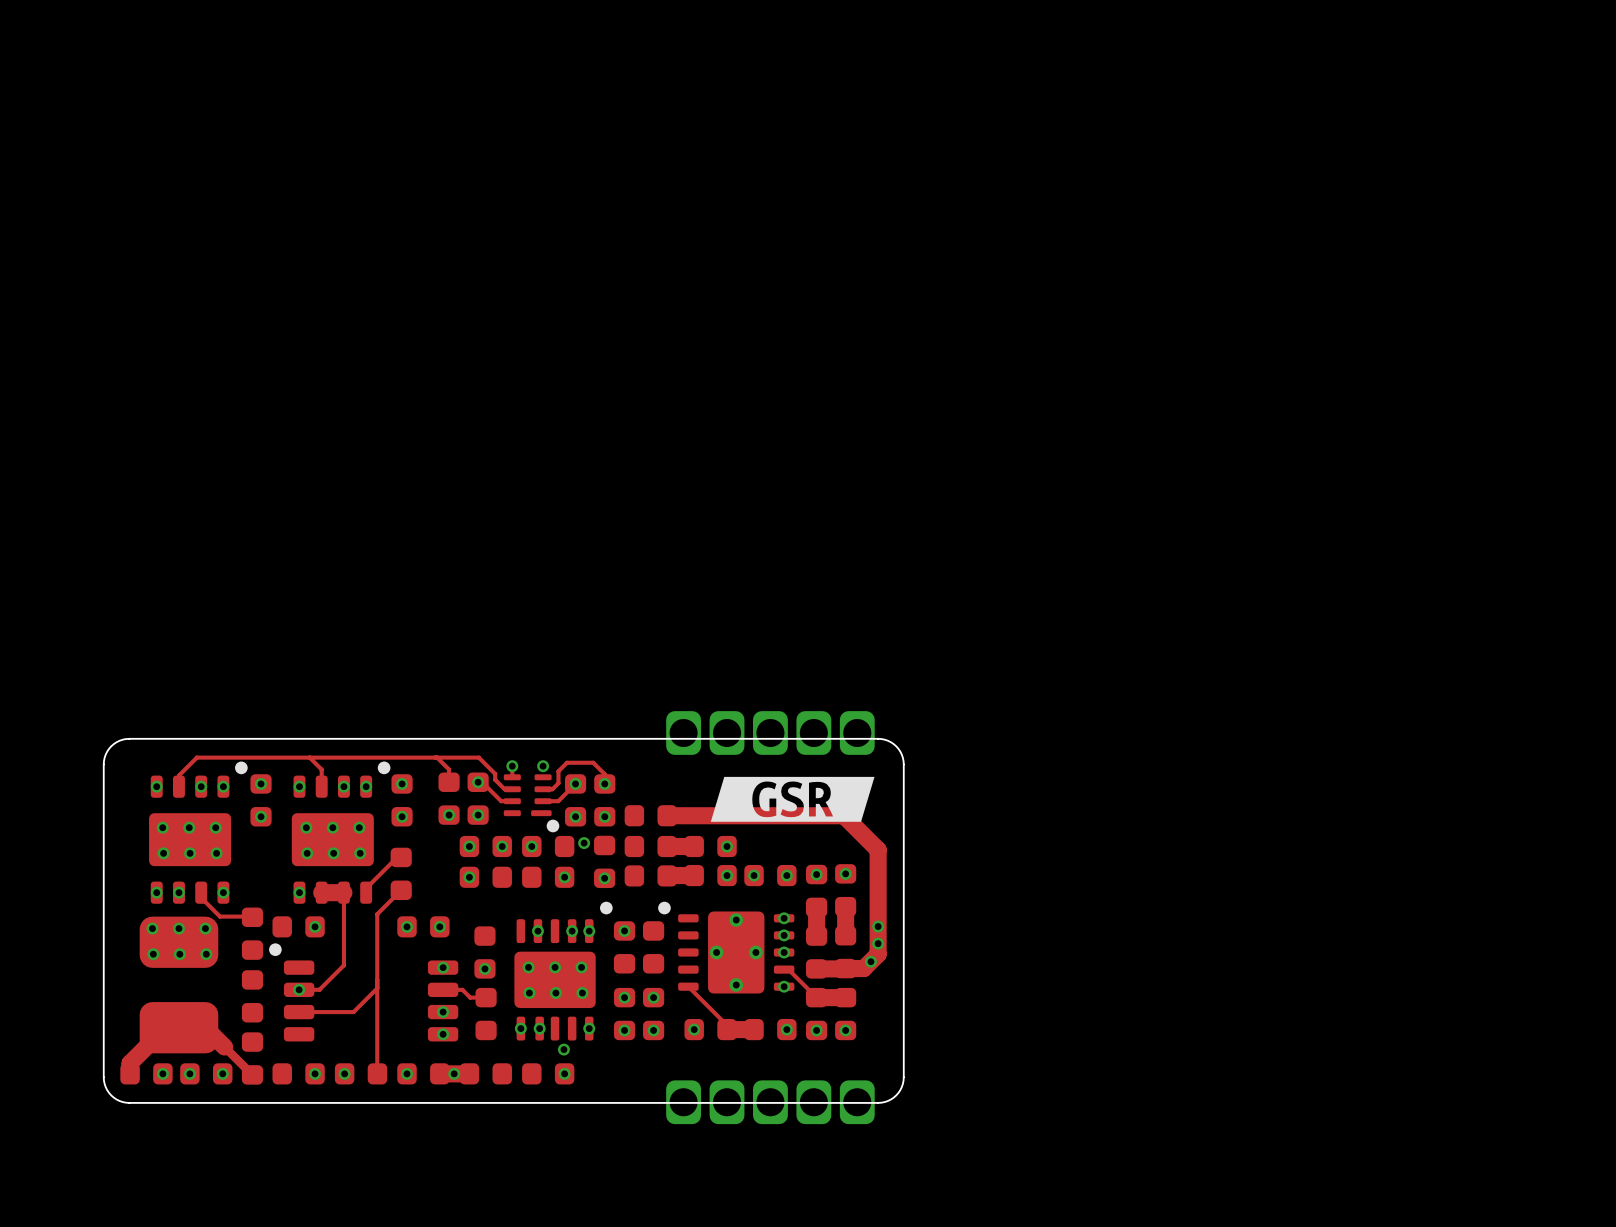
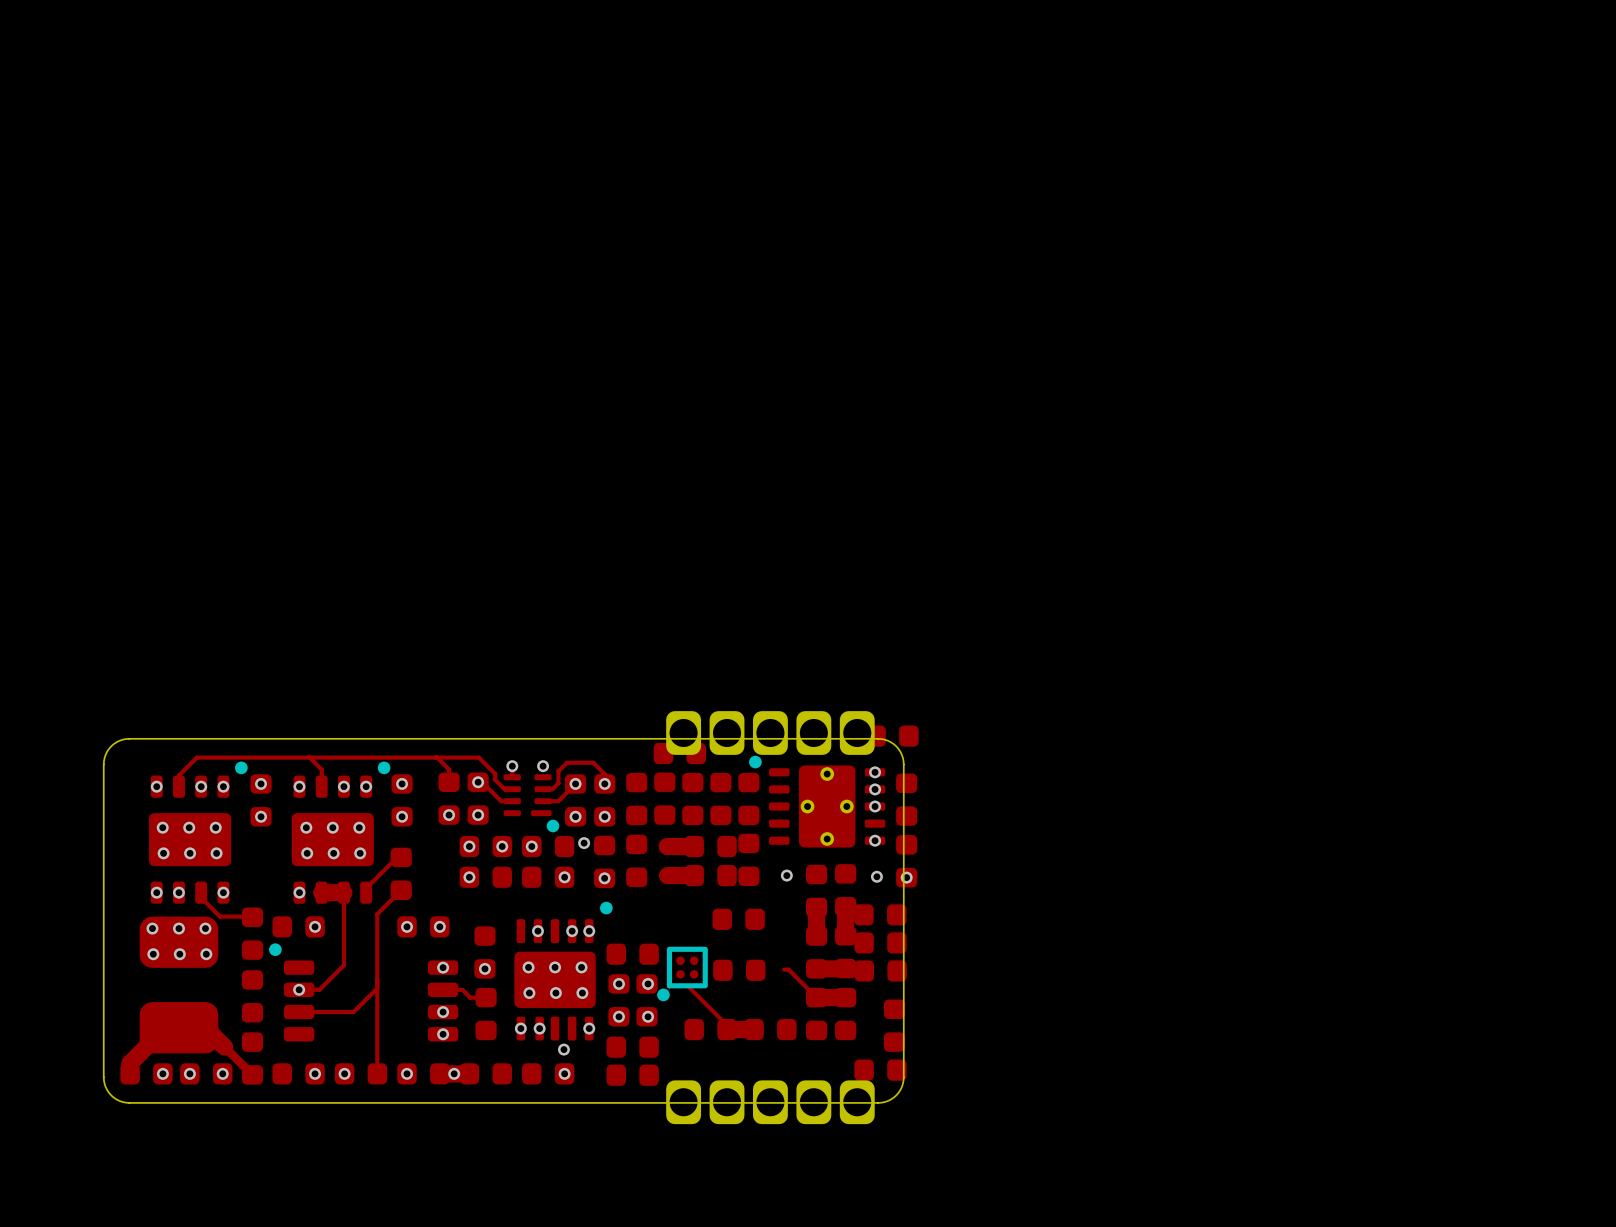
part: none -> (892, 736)
part: none -> (679, 753)
via: none -> (875, 772)
drawing: [710, 776, 875, 822] -> none
via: none -> (875, 789)
part: none -> (636, 798)
part: none -> (664, 798)
part: none -> (692, 798)
part: none -> (720, 798)
part: none -> (748, 798)
part: none -> (906, 799)
via: none -> (875, 806)
part: (650, 815) -> none
track: (667, 815) (843, 815) (878, 849) (878, 954) (863, 968) (845, 968) -> none
via: none -> (875, 840)
part: (650, 846) -> none
via: (727, 846) -> none
part: none -> (636, 860)
part: none -> (906, 861)
via: (845, 873) -> none
via: (816, 874) -> none
part: (650, 875) -> none
via: (727, 875) -> none
via: (754, 875) -> none
part rotation: 0° (770, 875) -> 90° clockwise (748, 859)
via: none -> (876, 876)
via: none -> (906, 877)
part: none -> (880, 914)
via: (784, 918) -> none
part: none -> (738, 919)
via: (878, 926) -> none
via: (624, 930) -> none
via: (784, 935) -> none
part: none -> (880, 942)
via: (878, 943) -> none
part rotation: 0° (624, 947) -> 90° clockwise (632, 954)
part: (653, 947) -> none
part position: (726, 947) -> (817, 801)
via: (784, 952) -> none
via: (870, 961) -> none
part: none -> (739, 970)
part: none -> (880, 970)
part: none -> (682, 973)
via: none -> (618, 983)
via: none -> (648, 983)
via: (784, 986) -> none
via: (624, 997) -> none
via: (653, 997) -> none
part: none -> (618, 1000)
part: none -> (647, 1000)
part: (624, 1014) -> none
part: (653, 1014) -> none
via: none -> (618, 1016)
via: none -> (648, 1016)
part: none -> (894, 1025)
via: (694, 1029) -> none
via: (786, 1029) -> none
via: (624, 1030) -> none
via: (653, 1030) -> none
via: (816, 1030) -> none
via: (845, 1030) -> none
part: none -> (632, 1047)
part: none -> (880, 1070)
part: none -> (632, 1075)

